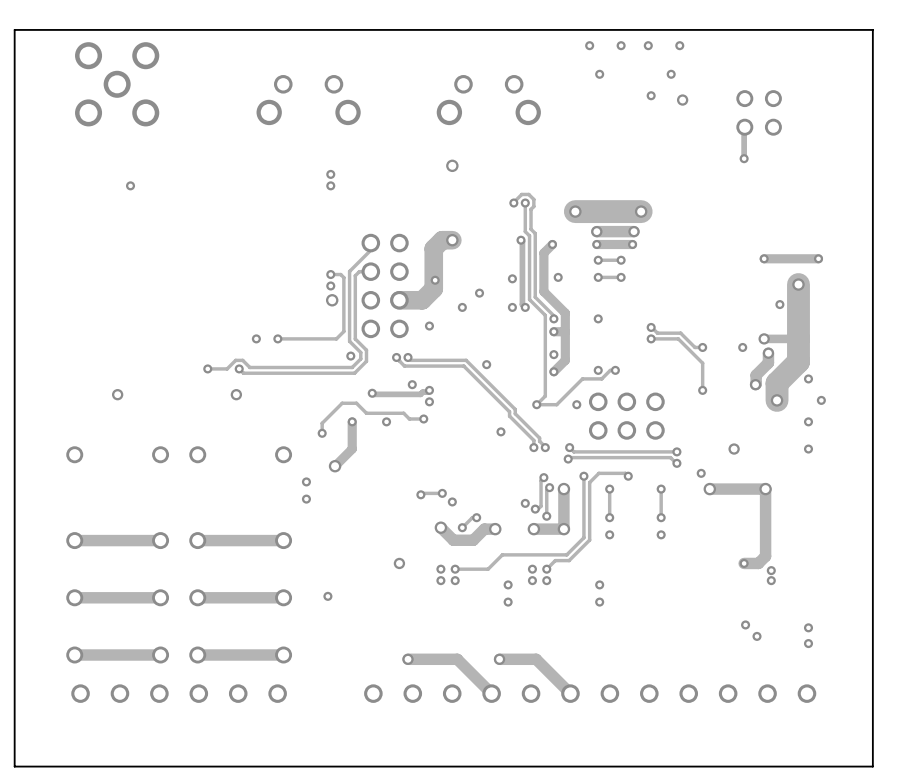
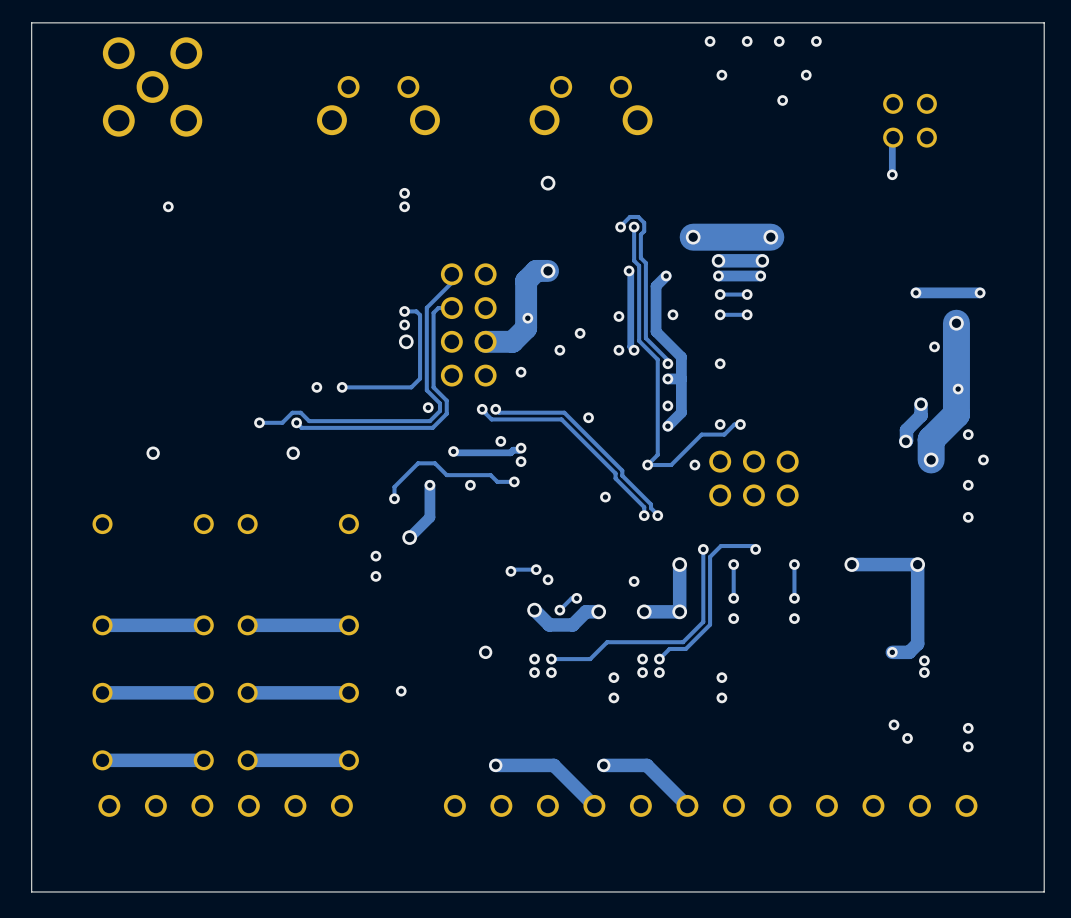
via: (682, 100) -> none
track: (651, 327) (657, 333) (680, 333) (695, 347) (702, 347) -> none
via: (651, 327) -> none
track: (651, 338) (678, 338) (702, 363) (702, 390) -> none
via: (651, 338) -> none
via: (764, 338) -> none
track: (798, 338) (764, 338) -> none
via: none -> (958, 389)
via: (702, 347) -> none
via: (742, 347) -> none
via: (702, 390) -> none
track: (569, 447) (573, 451) (676, 451) -> none
via: (569, 447) -> none
via: (734, 449) -> none
via: (676, 451) -> none
track: (568, 459) (670, 457) (676, 463) -> none
via: (568, 459) -> none
via: (676, 463) -> none
via: (701, 473) -> none
track: (543, 477) (541, 480) (541, 506) (535, 509) -> none
via: (543, 477) -> none
track: (549, 487) (546, 490) (546, 516) -> none
via: (549, 487) -> none
via: (535, 509) -> none
via: (546, 516) -> none

